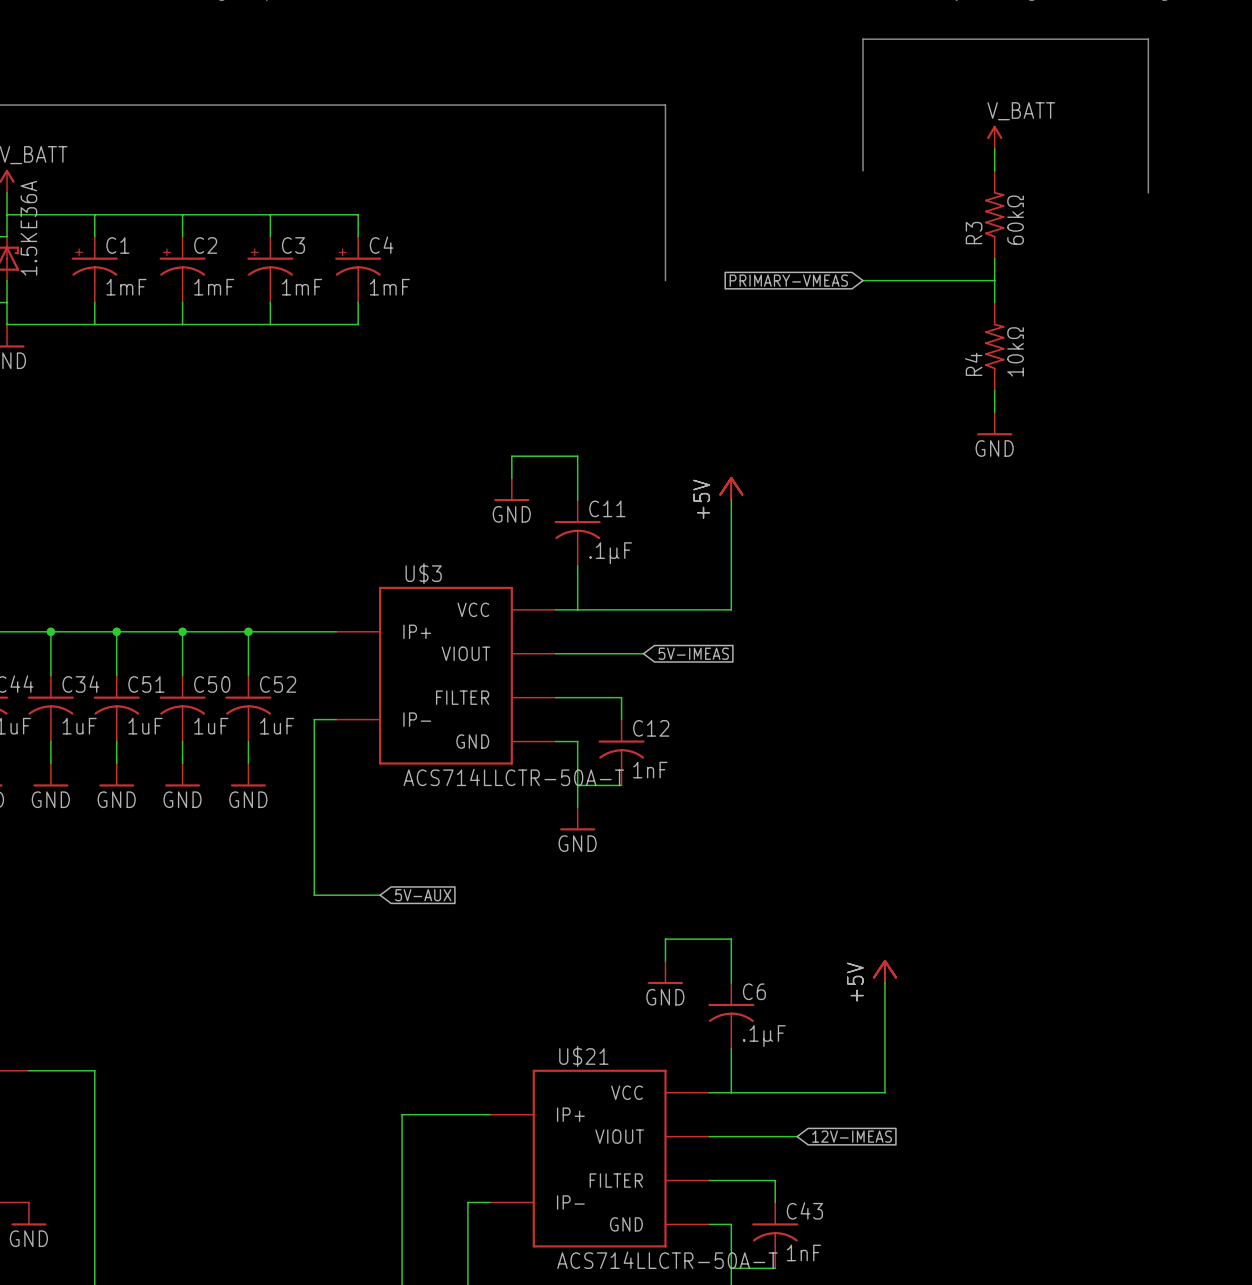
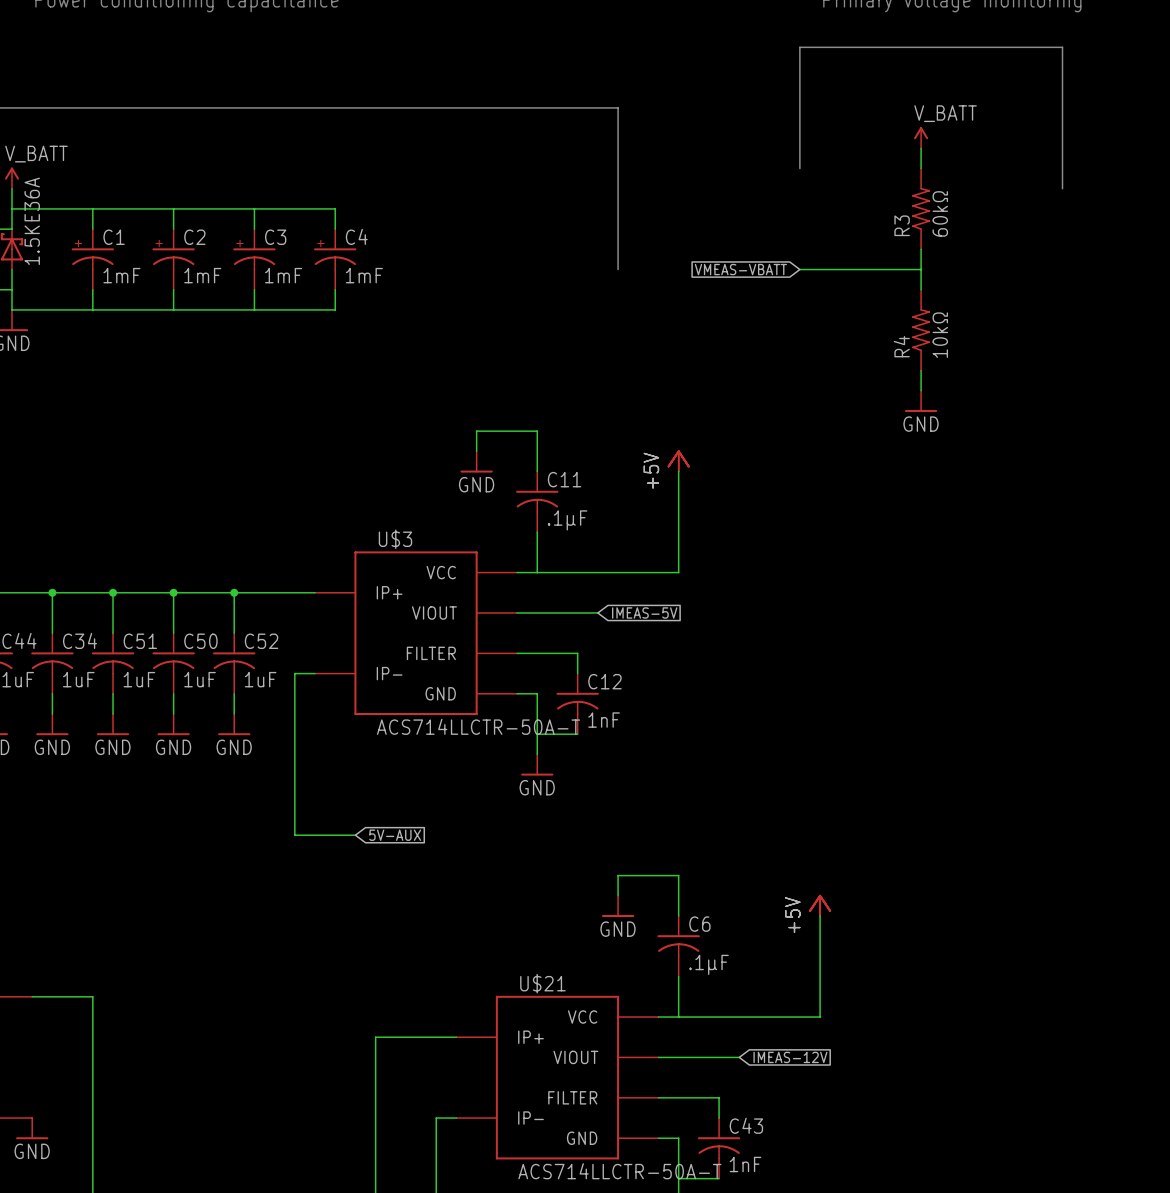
global label: PRIMARY-VMEAS (788, 280) -> VMEAS-VBATT (740, 269)
global label: 5V-IMEAS (693, 653) -> IMEAS-5V (644, 612)
global label: 12V-IMEAS (852, 1136) -> IMEAS-12V (790, 1057)

